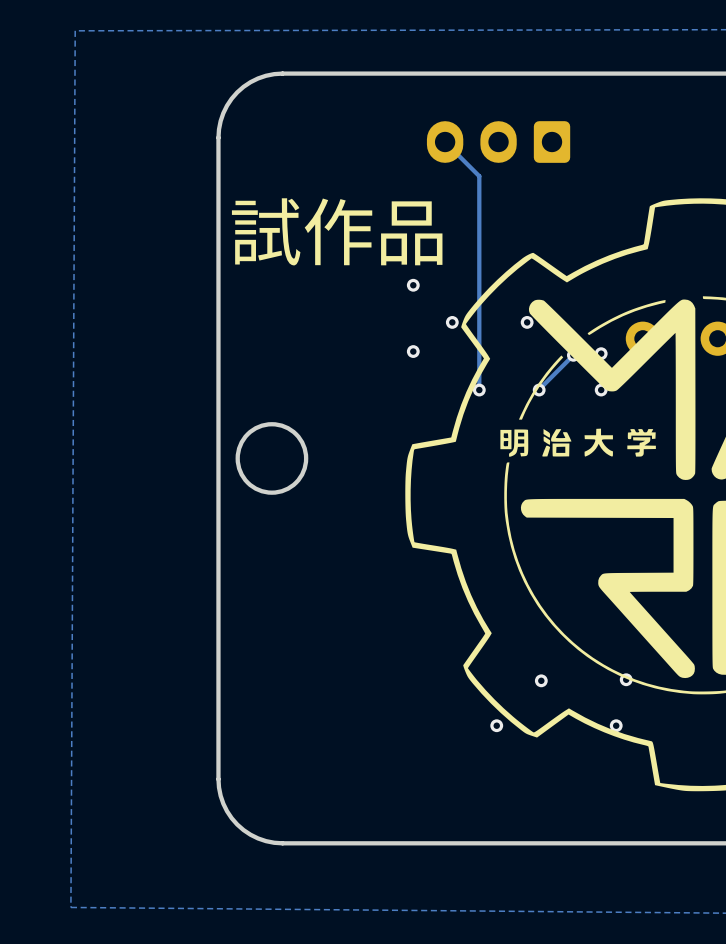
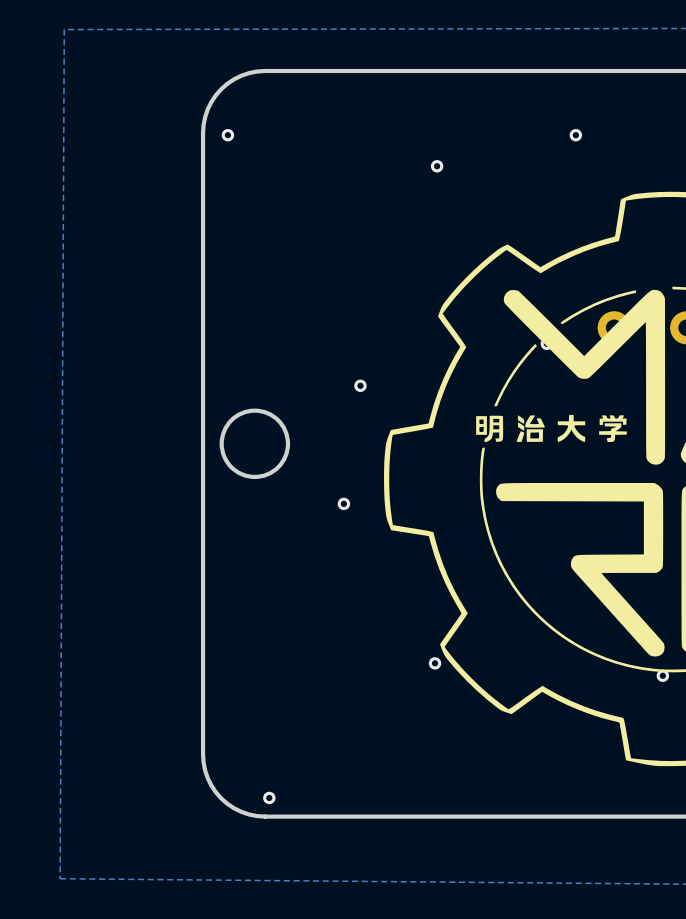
via: none -> (227, 135)
via: none -> (575, 135)
track: (445, 142) (479, 176) (479, 390) -> none
part: (498, 142) -> none
via: none -> (437, 166)
text: 試作品 (337, 231) -> none
via: (413, 285) -> none
via: (452, 322) -> none
via: (527, 322) -> none
via: (413, 351) -> none
via: (601, 353) -> none
track: (573, 355) (539, 390) -> none
via: (479, 390) -> none
via: (539, 390) -> none
via: (601, 390) -> none
via: none -> (360, 385)
via: none -> (343, 503)
via: (626, 679) -> none
via: (541, 680) -> none
via: none -> (435, 663)
via: none -> (662, 675)
via: (496, 725) -> none
via: (616, 725) -> none
via: none -> (269, 797)

